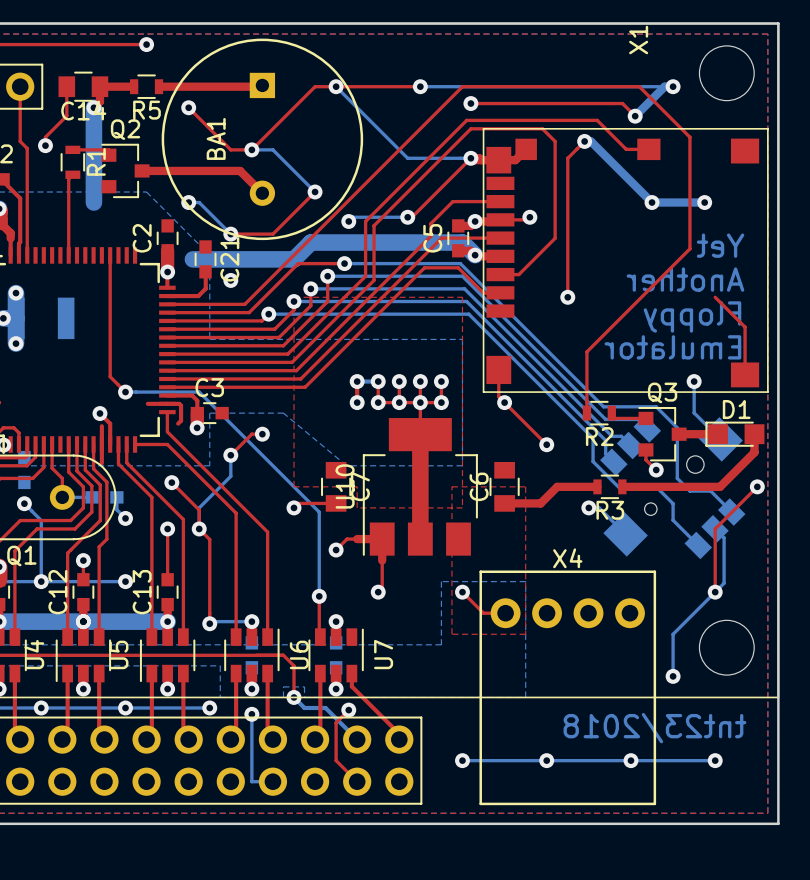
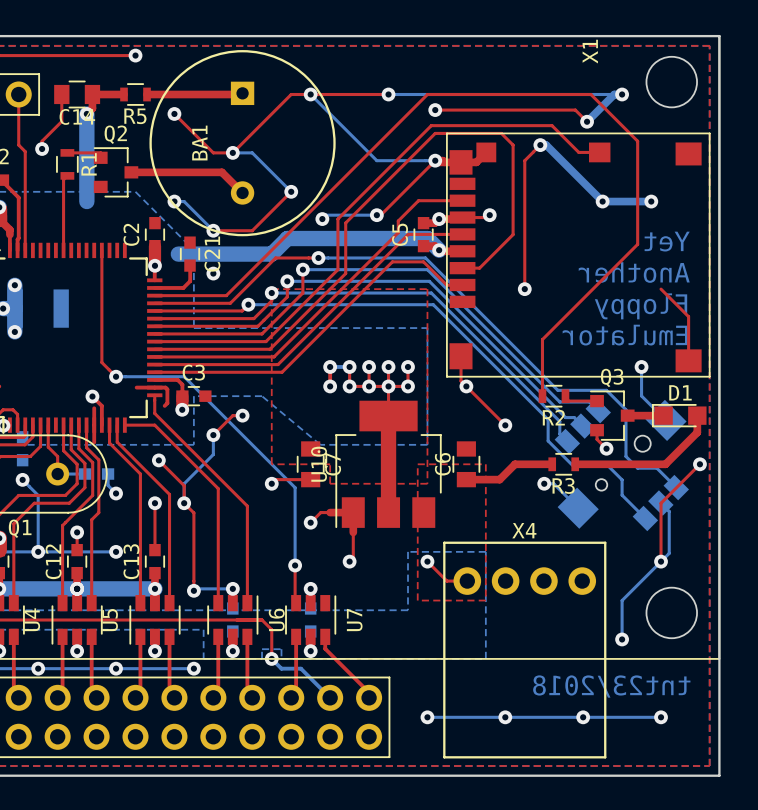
top track: (348, 710) (336, 722) (336, 760) (357, 781) -> none
via: (348, 710) -> none
bottom track: (251, 714) (251, 781) (272, 781) -> none
via: (251, 714) -> none

